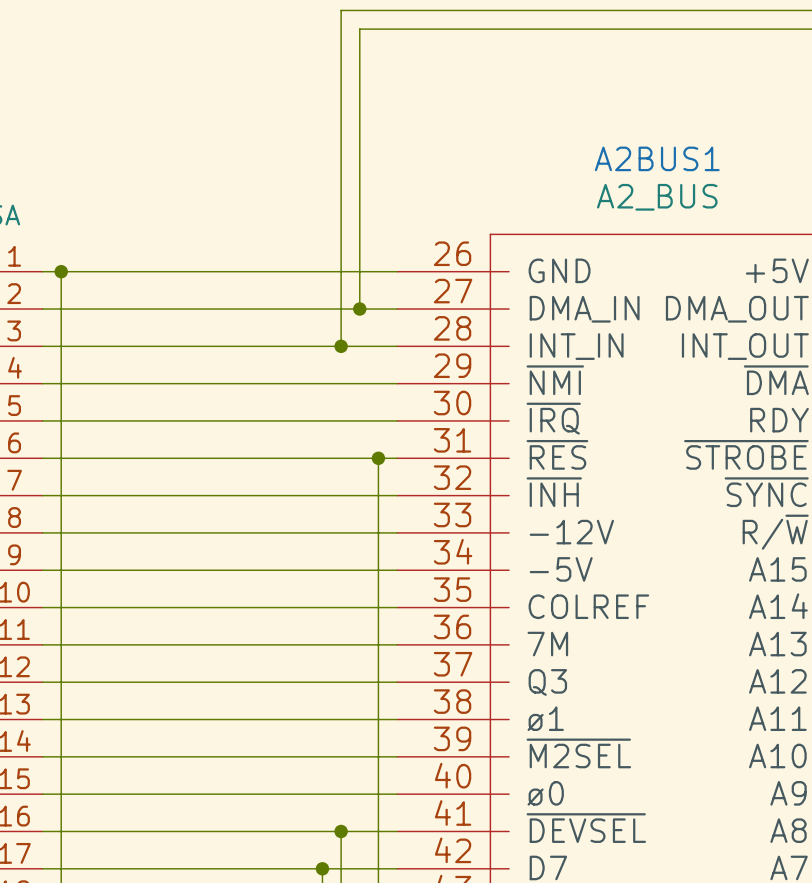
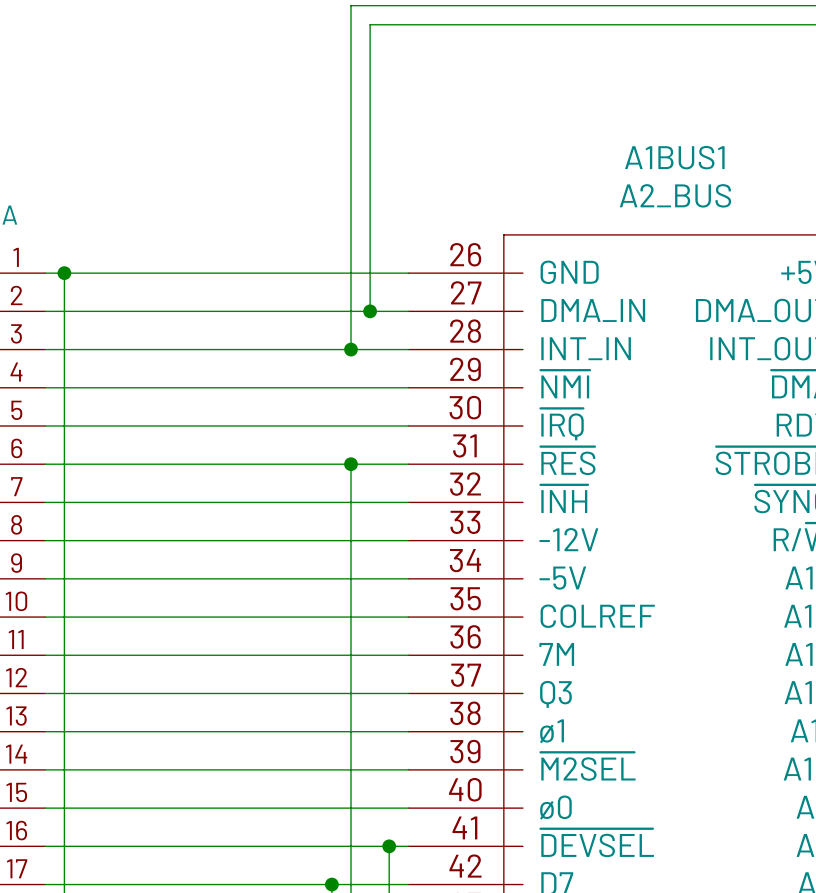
A2BUS1 name: A2BUS1 (657, 158) -> A1BUS1 (674, 157)
wire: (378, 458) (378, 831) -> (350, 464) (350, 846)
junction position: (378, 458) -> (350, 464)
junction position: (341, 831) -> (389, 846)

